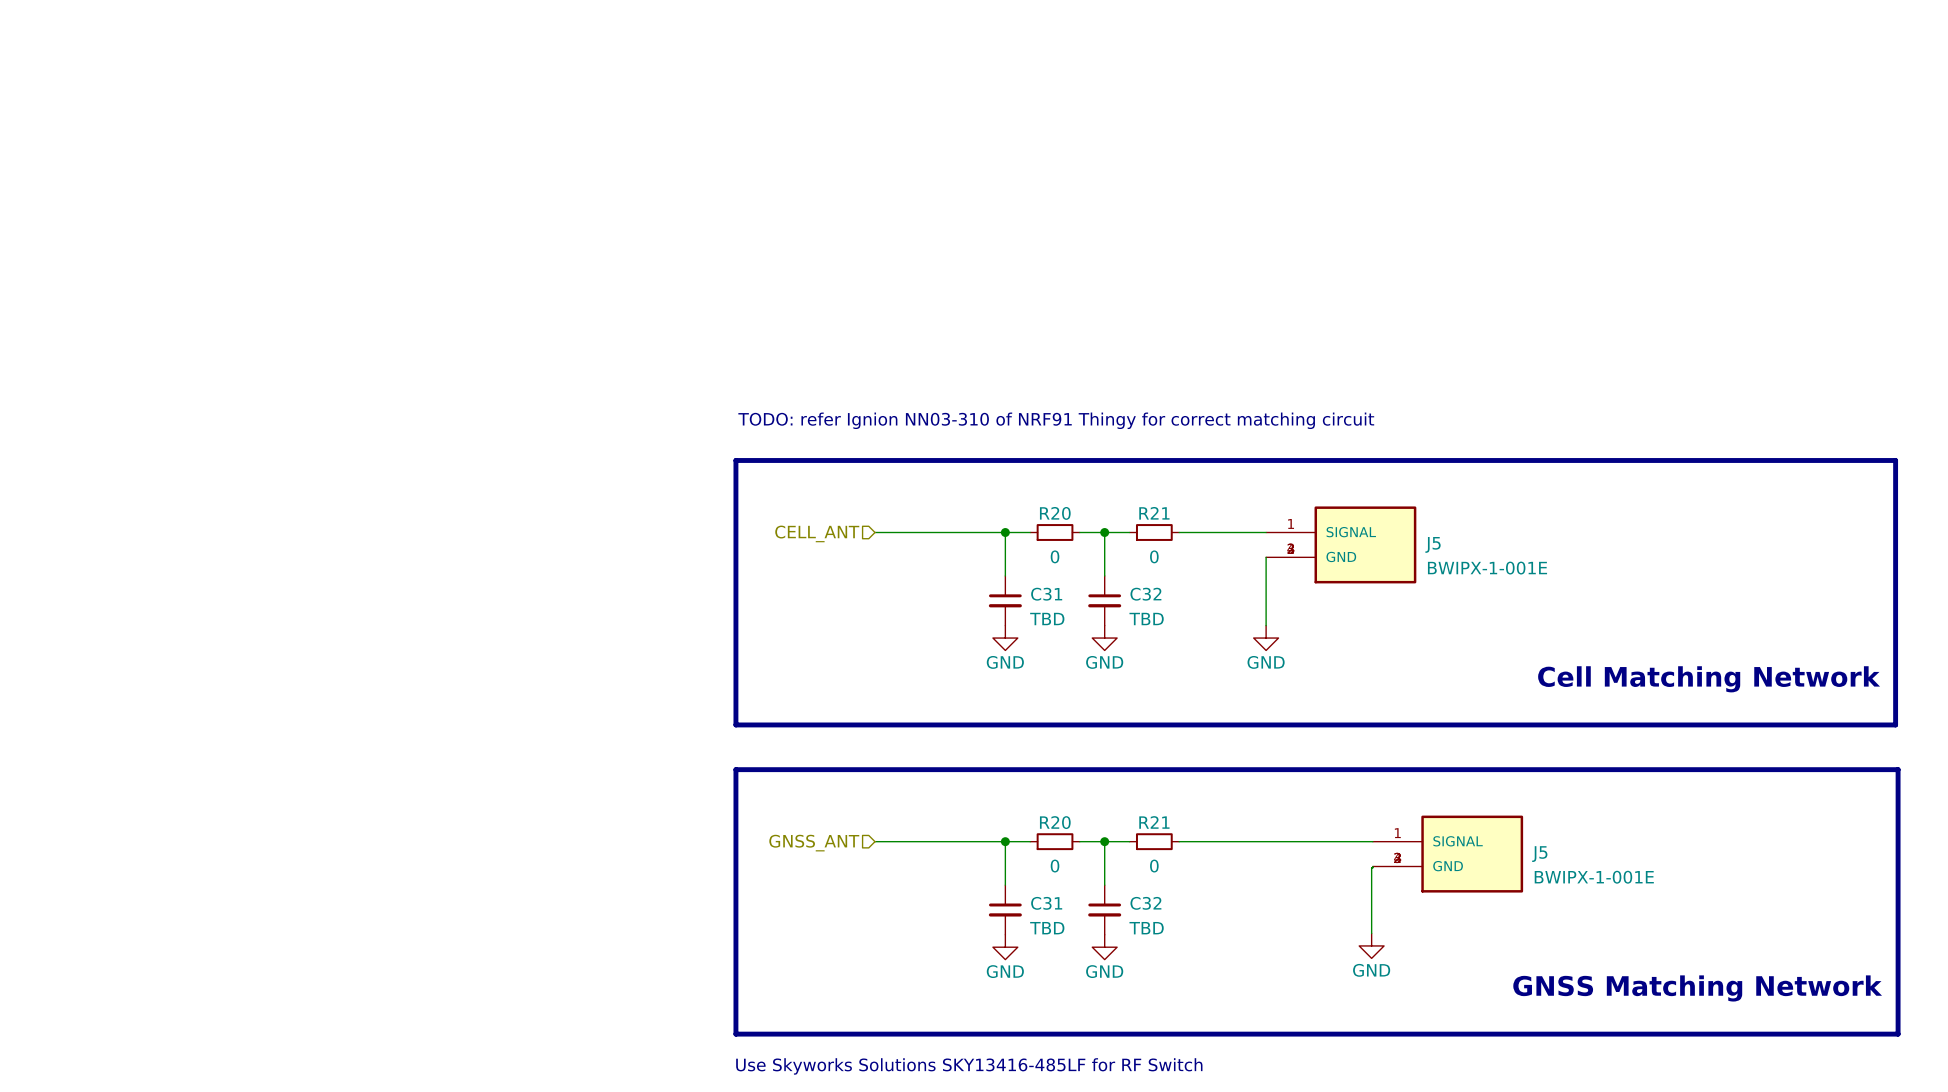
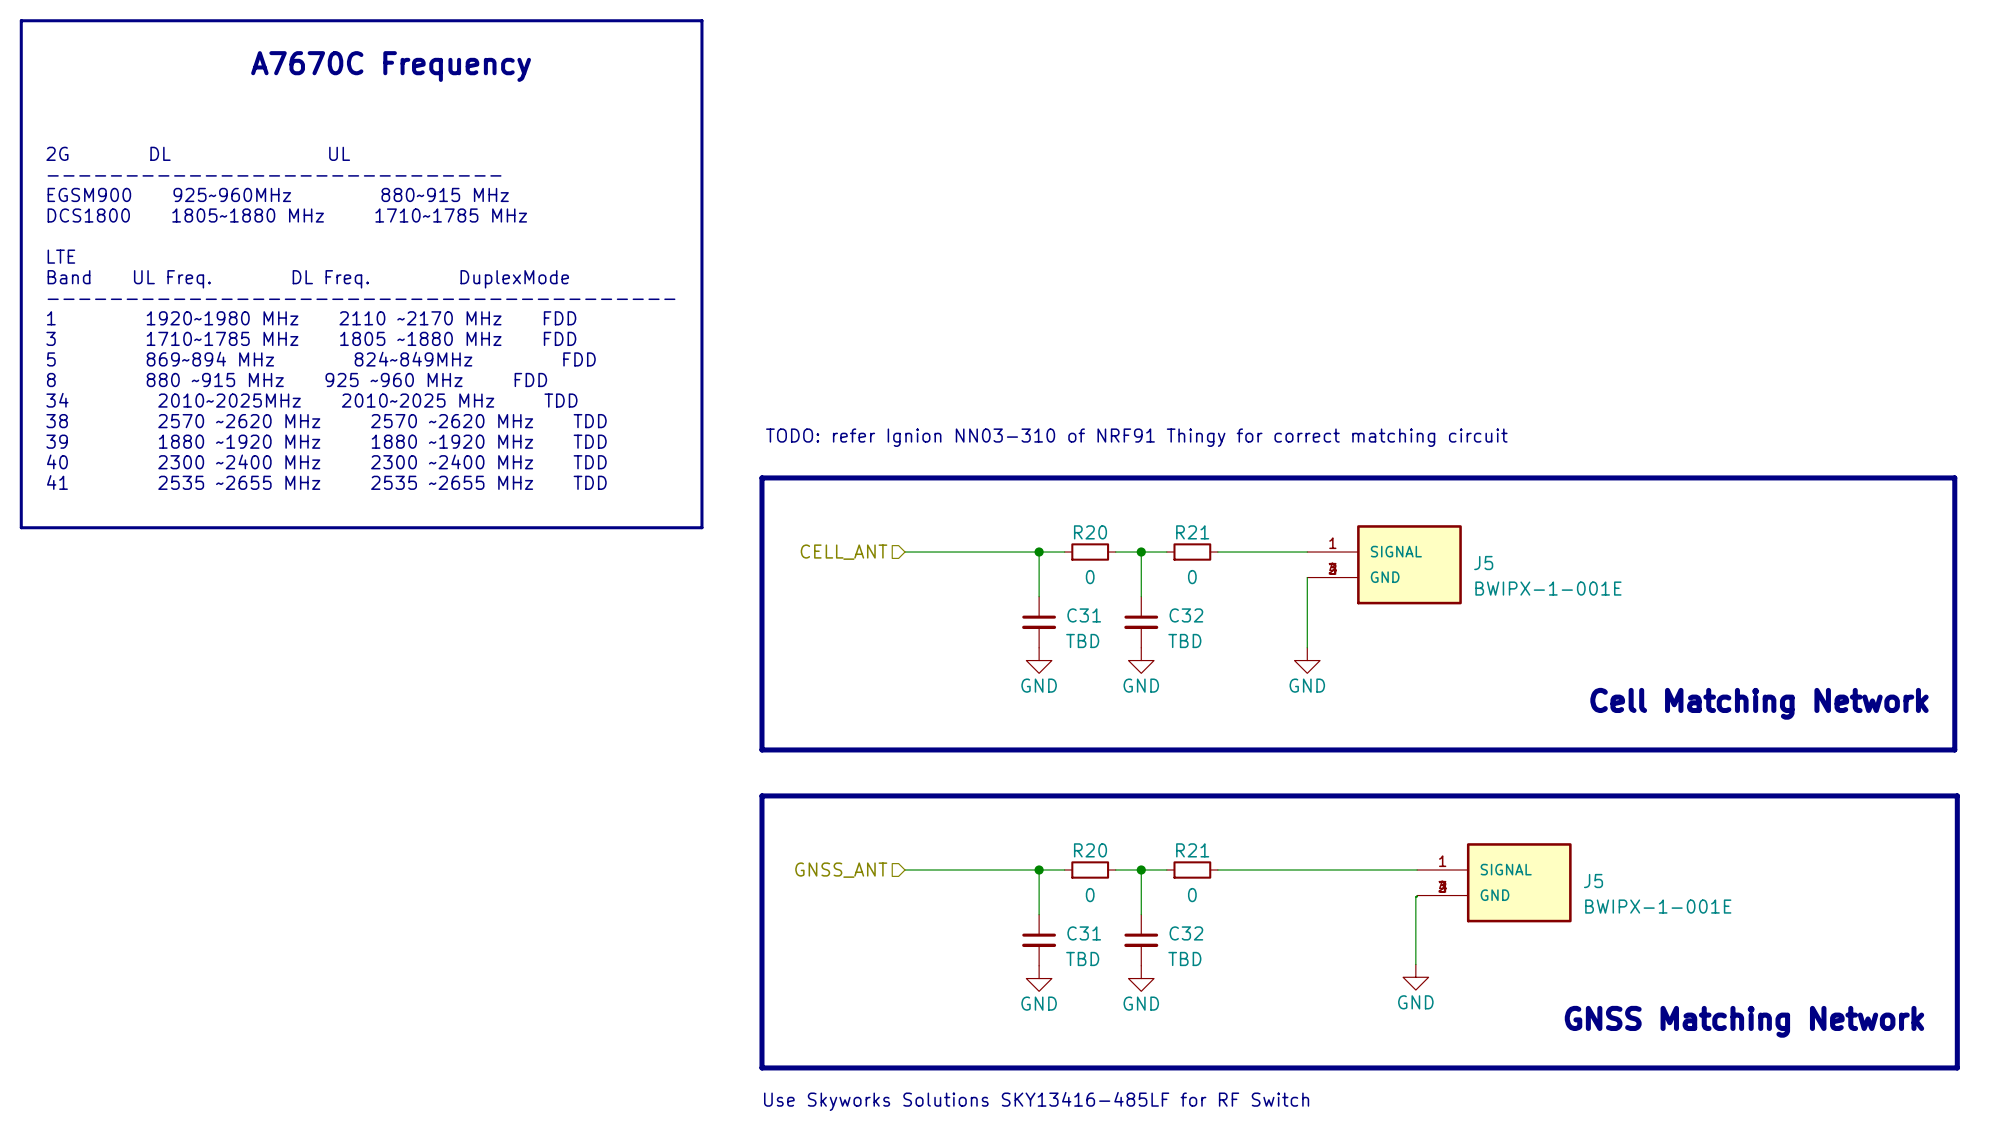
line: none -> (21, 20) (701, 20) (701, 527) (21, 527) (21, 20)
text: none -> A7670C Frequency (391, 66)
text: none -> 2G DL UL (198, 153)
text: none -> ----------------------------- (274, 175)
text: none -> EGSM900 925~960MHz 880~915 MHz (278, 194)
text: none -> DCS1800 1805~1880 MHz 1710~1785 MHz (287, 215)
text: none -> LTE (61, 256)
text: none -> Band UL Freq. DL Freq. DuplexMode (308, 279)
text: none -> ---------------------------------------- (361, 299)
text: none -> 1 1920~1980 MHz 2110 ~2170 MHz FDD (311, 318)
text: none -> 3 1710~1785 MHz 1805 ~1880 MHz FDD (311, 338)
text: none -> 5 869~894 MHz 824~849MHz FDD (321, 359)
text: none -> 8 880 ~915 MHz 925 ~960 MHz FDD (297, 379)
text: none -> 34 2010~2025MHz 2010~2025 MHz TDD (311, 400)
text: none -> 38 2570 ~2620 MHz 2570 ~2620 MHz TDD (326, 421)
text: none -> 39 1880 ~1920 MHz 1880 ~1920 MHz TDD (326, 441)
text: none -> 40 2300 ~2400 MHz 2300 ~2400 MHz TDD (326, 461)
text: none -> 41 2535 ~2655 MHz 2535 ~2655 MHz TDD (326, 482)

